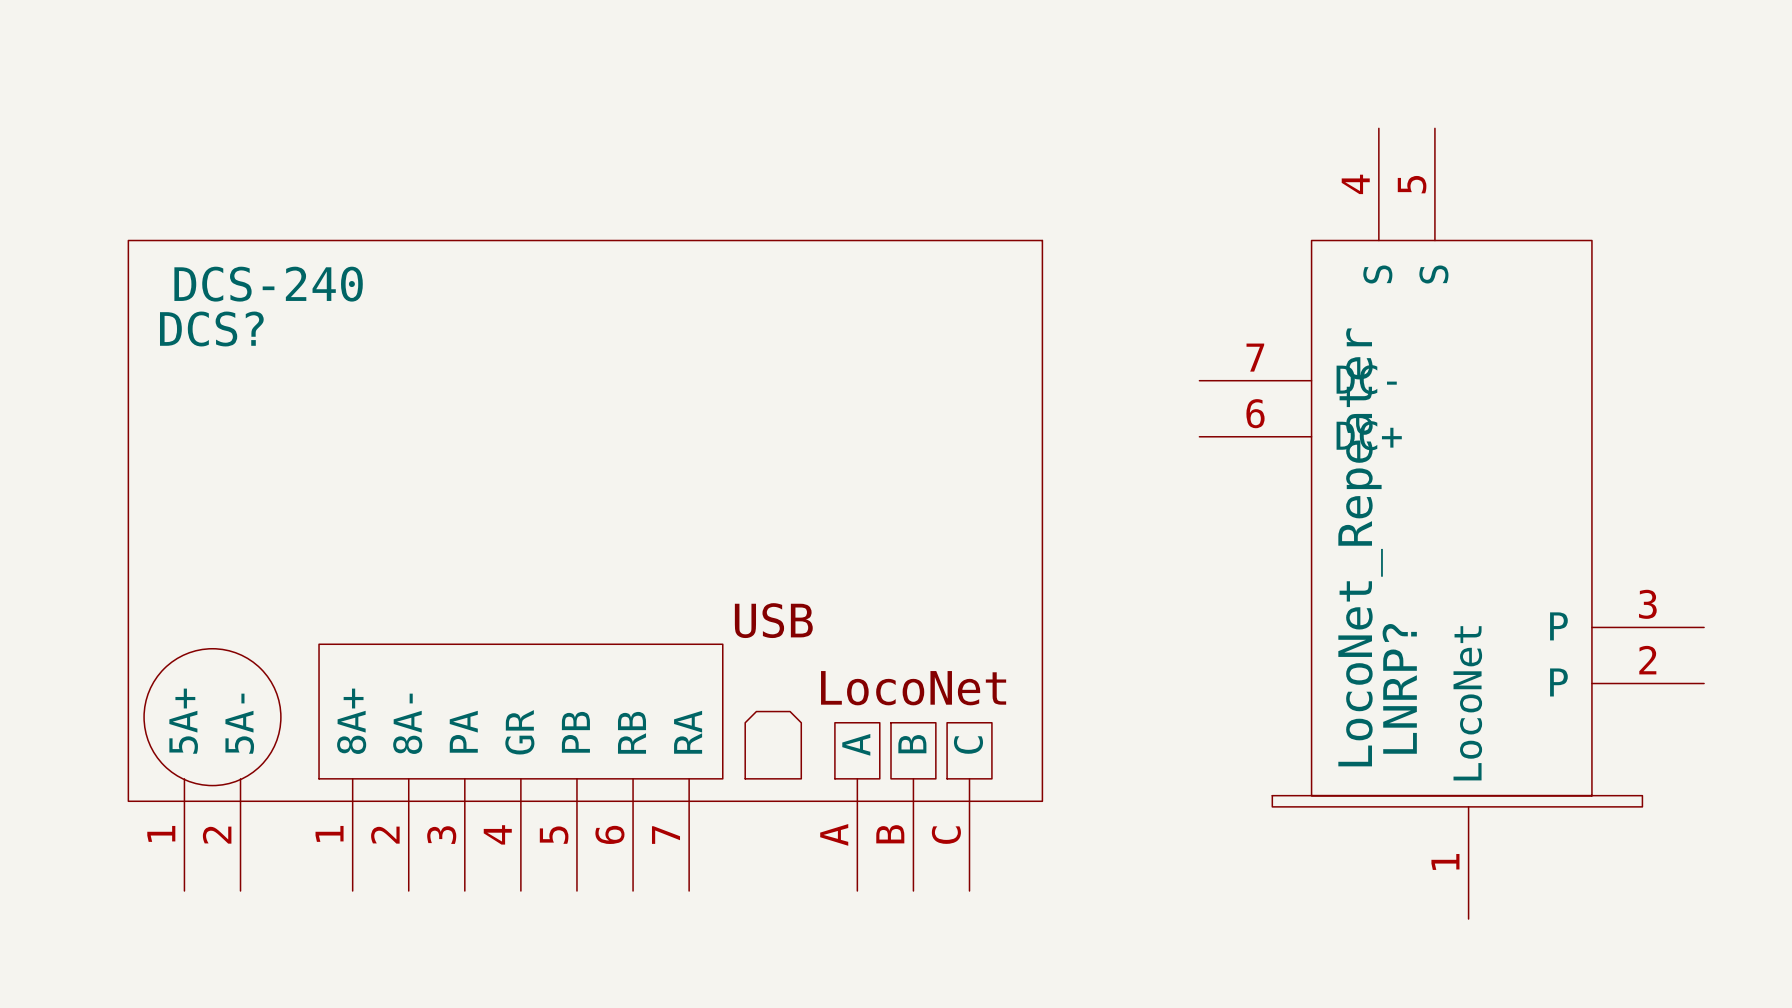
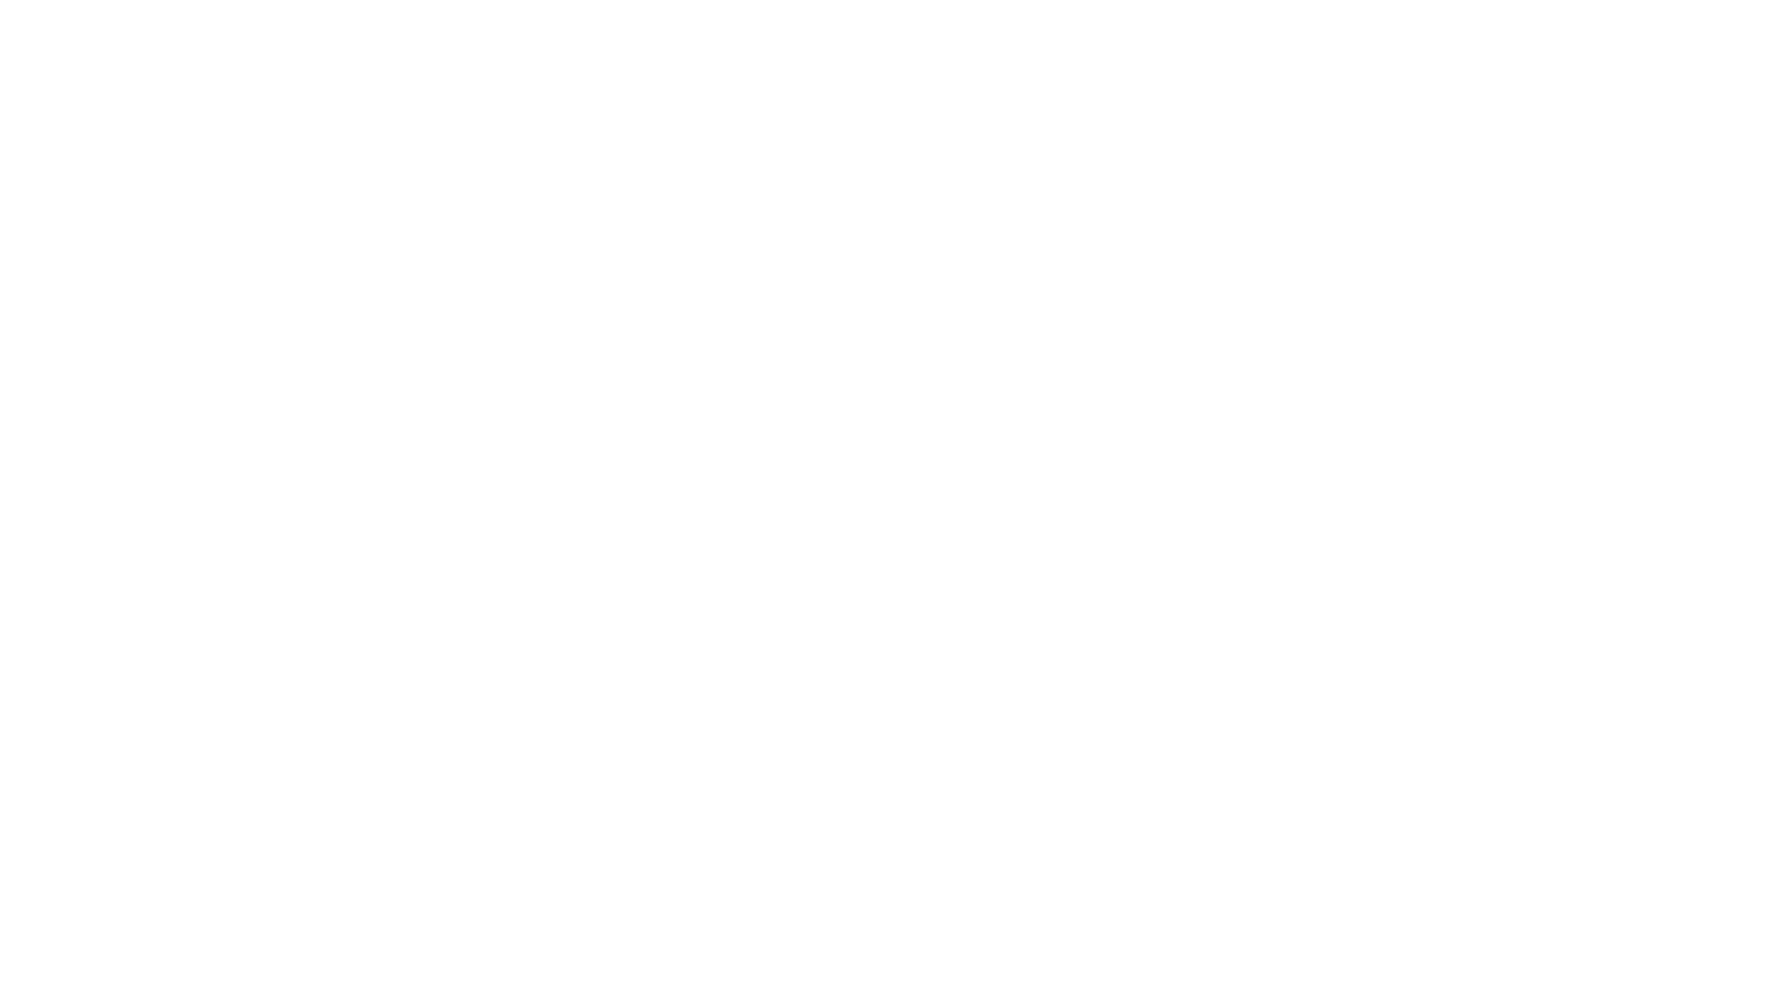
LNRP?: LocoNet_Repeater (1451, 523) -> none
DCS?: DCS-240 (585, 565) -> none

